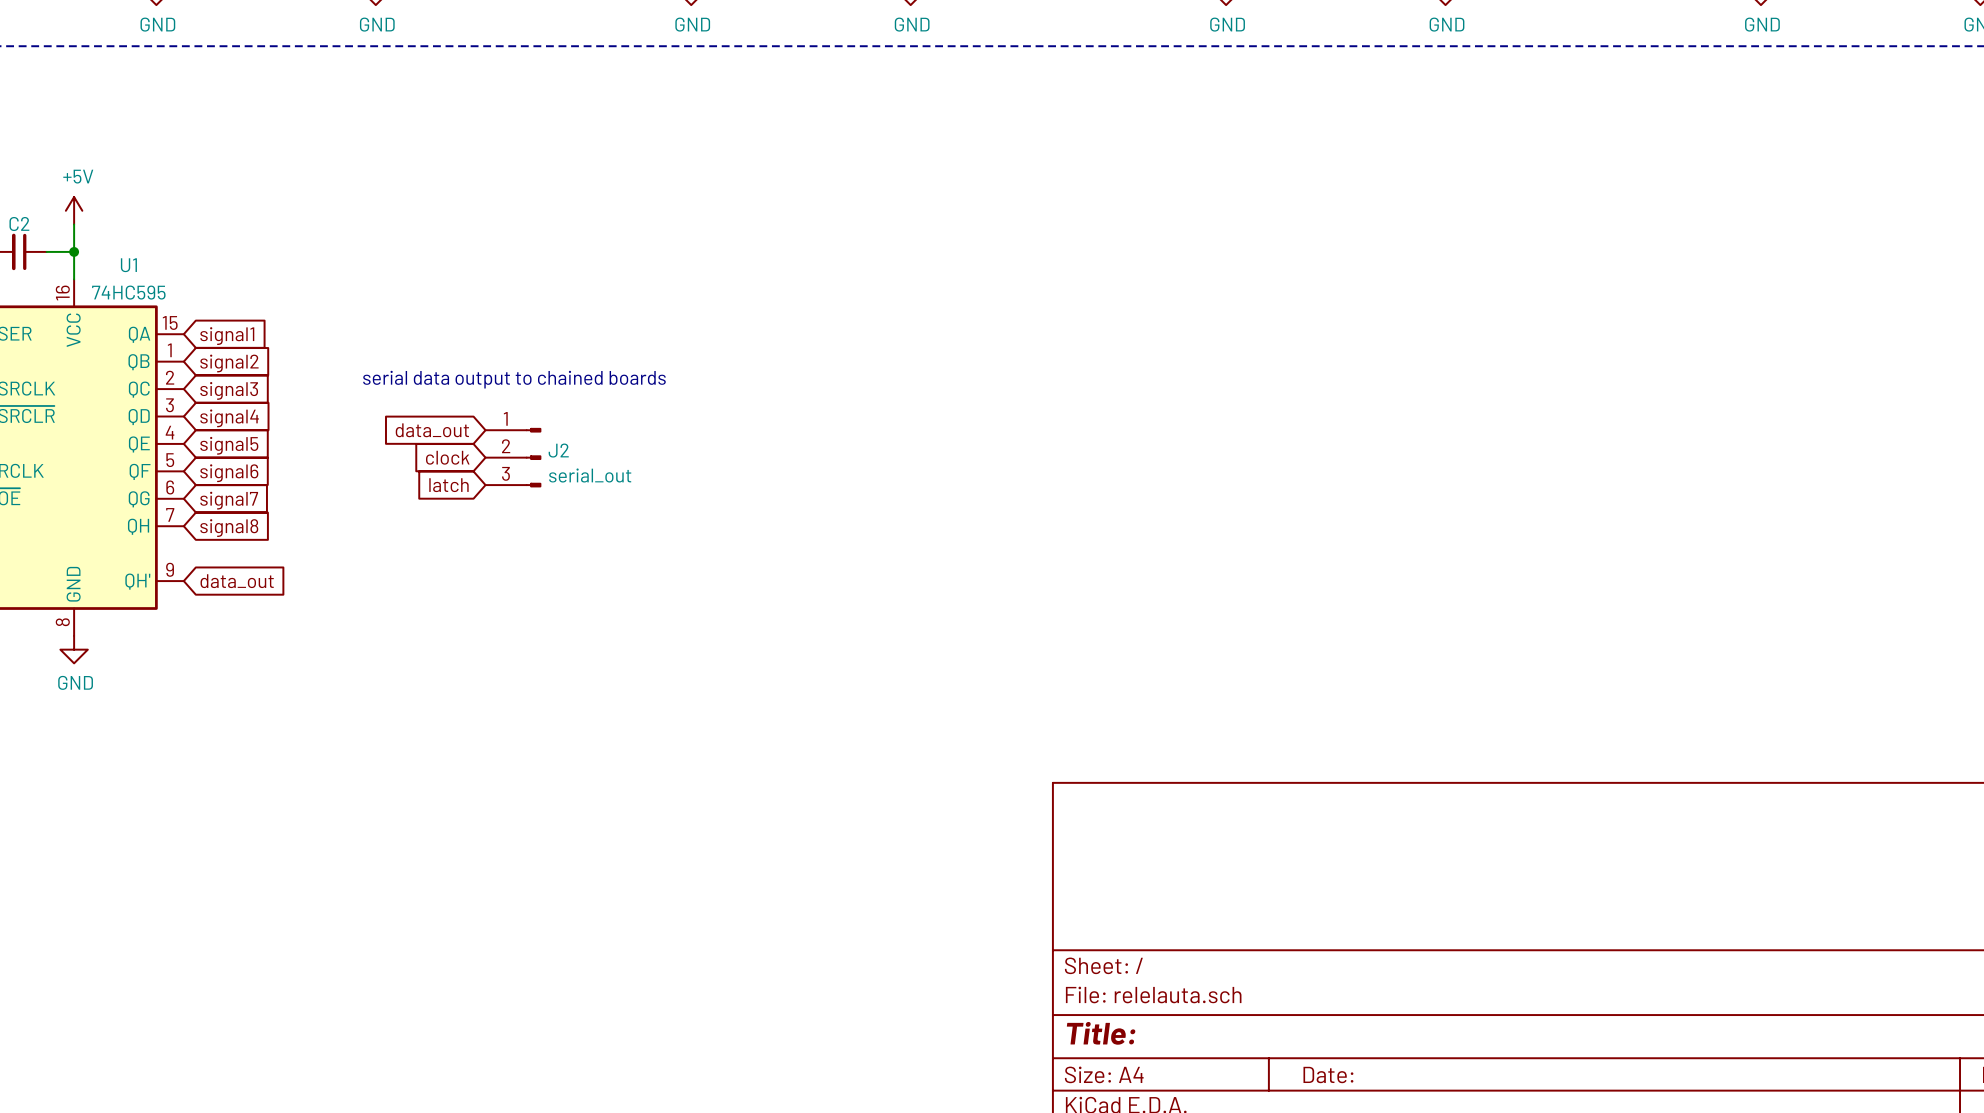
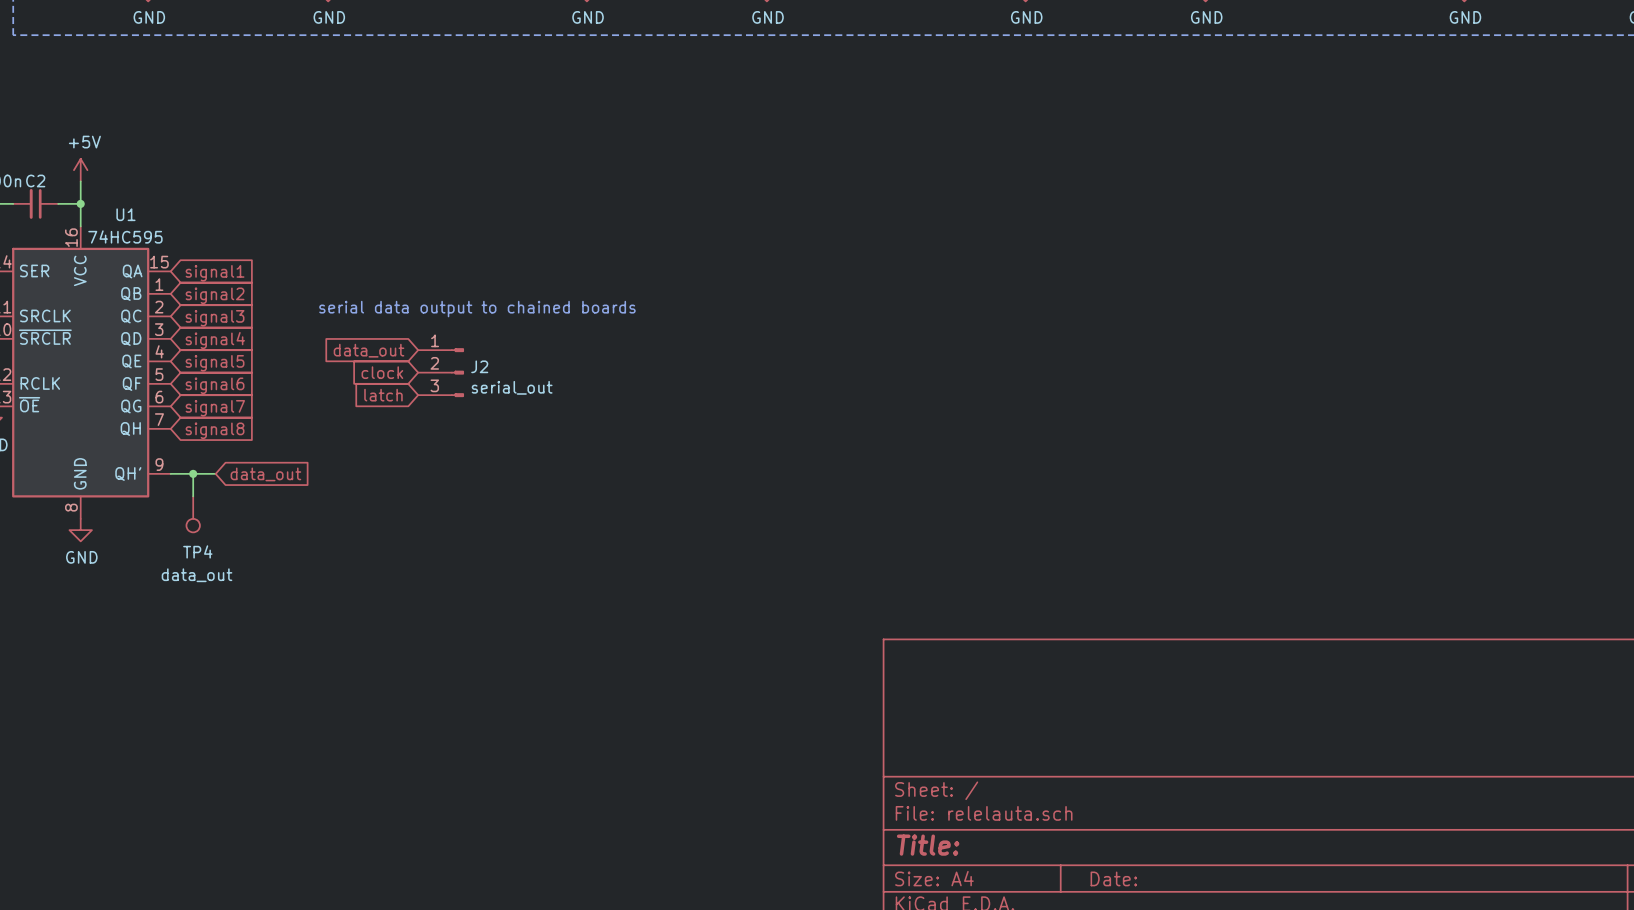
wire: none -> (170, 473) (215, 473)
wire: none -> (193, 473) (193, 496)
junction: none -> (193, 473)
global label position: data_out (237, 581) -> data_out (265, 474)
TP4: none -> data_out (193, 514)

